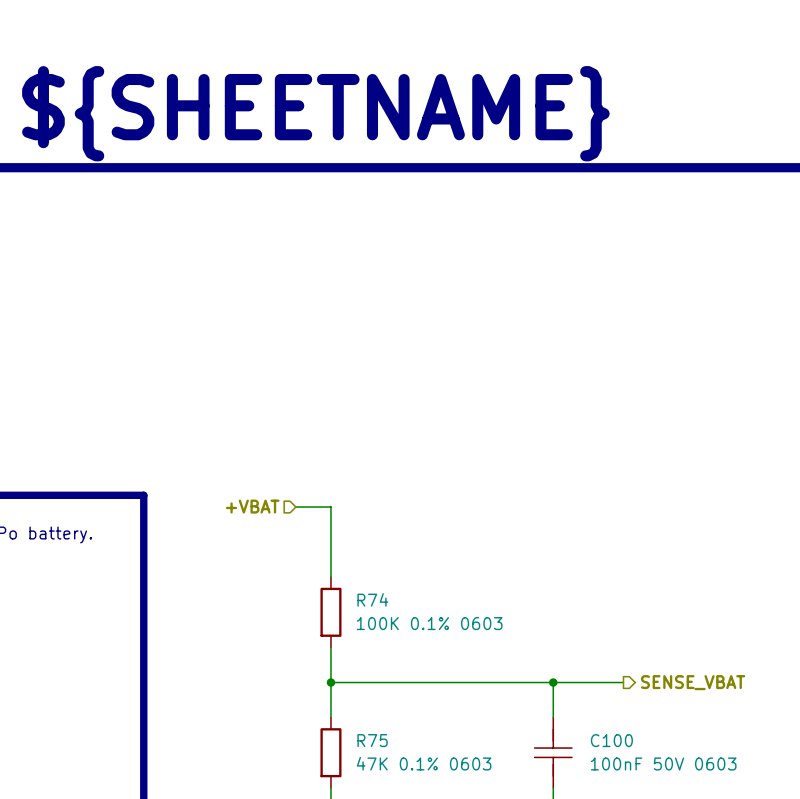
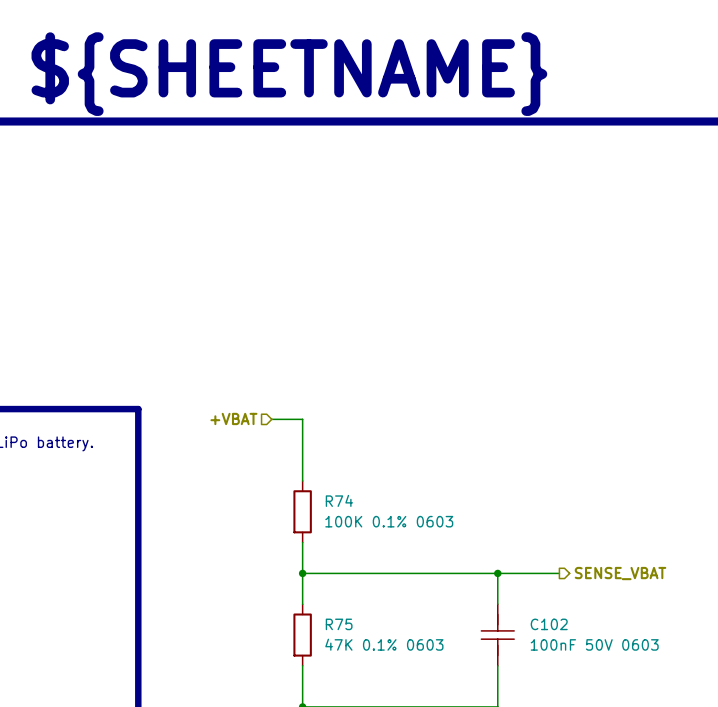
C100 name: C100 (611, 740) -> C102 (549, 624)

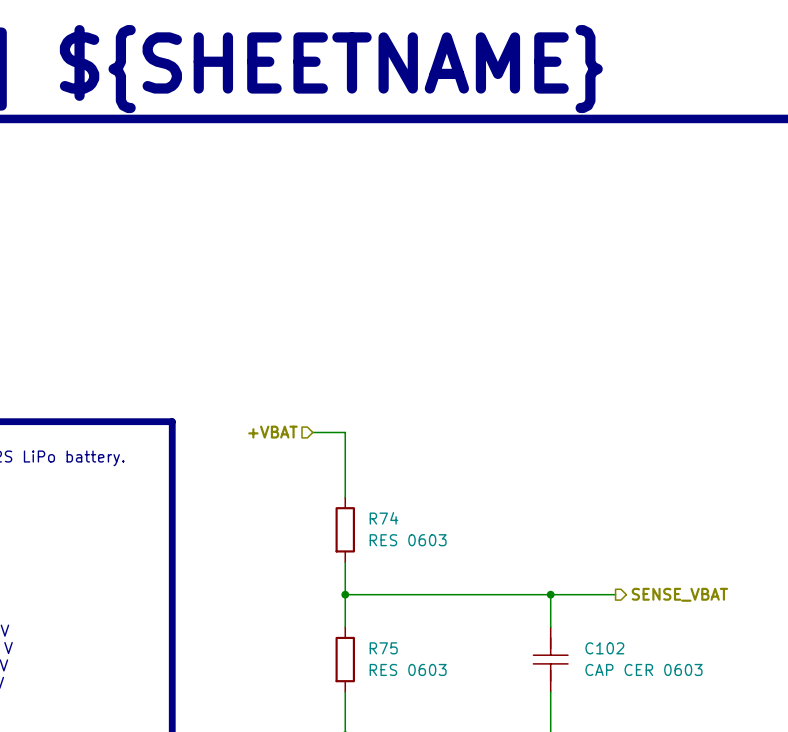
R74 value: 100K 0.1% 0603 (389, 521) -> RES 0603 (408, 540)
R75 value: 47K 0.1% 0603 (384, 644) -> RES 0603 (408, 669)
C102 value: 100nF 50V 0603 (594, 644) -> CAP CER 0603 (643, 669)

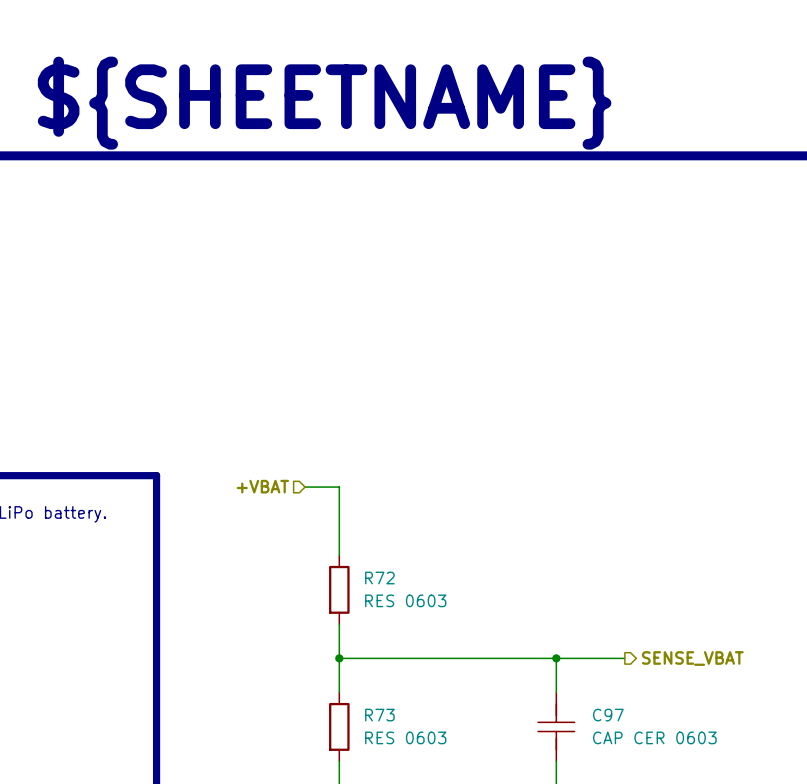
R74 name: R74 (383, 518) -> R72 (379, 578)
R75 name: R75 (383, 648) -> R73 (379, 715)
C102 name: C102 (604, 648) -> C97 (608, 715)

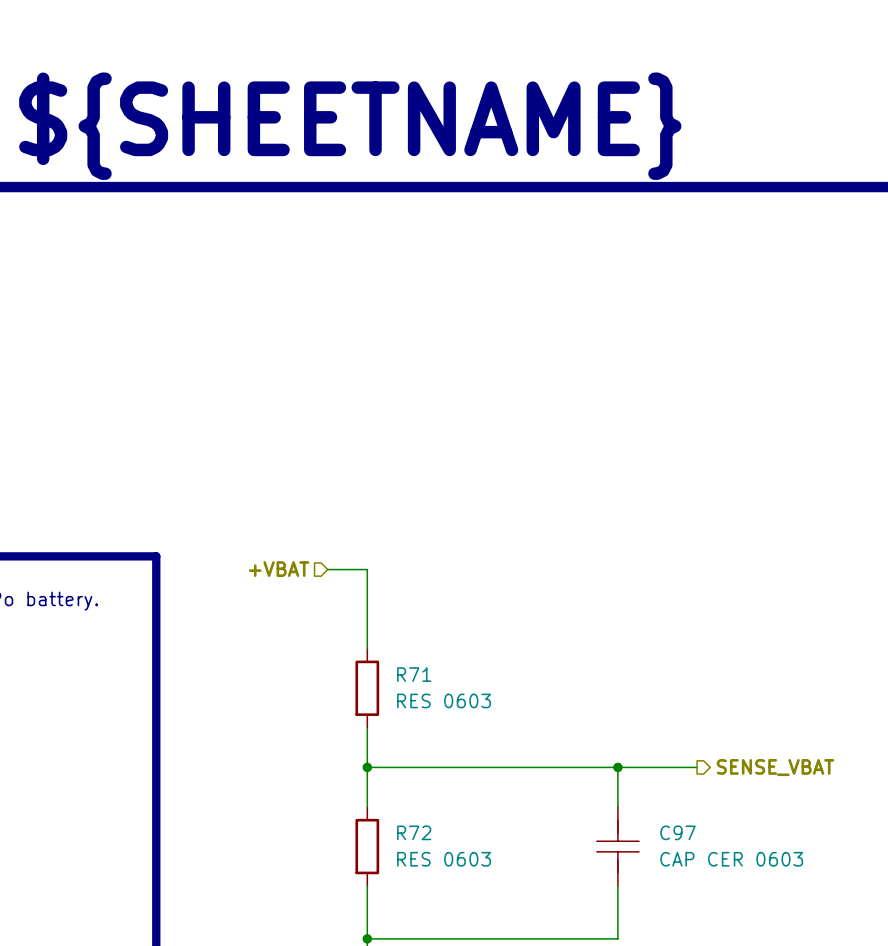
R72 name: R72 (379, 578) -> R71 (414, 674)
R73 name: R73 (379, 715) -> R72 (414, 832)

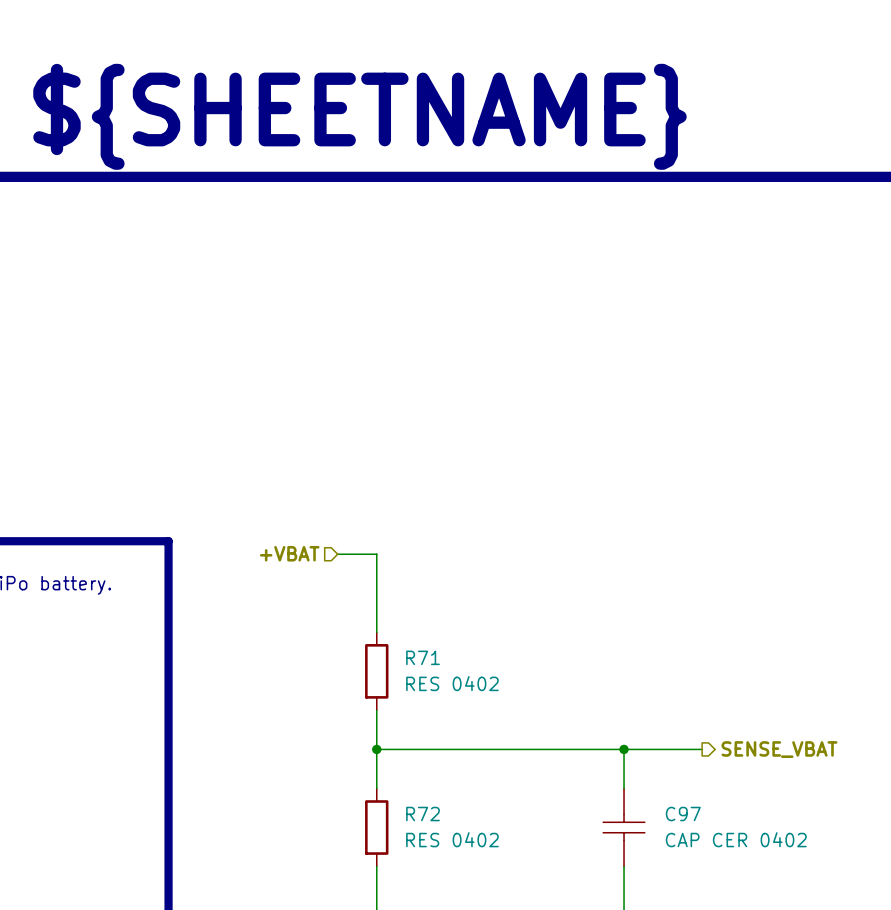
R71 value: RES 0603 (444, 700) -> RES 0402 (452, 683)
C97 symbol: [596, 806, 640, 887] -> [603, 788, 645, 867]
R72 value: RES 0603 (444, 859) -> RES 0402 (452, 839)
C97 value: CAP CER 0603 (731, 859) -> CAP CER 0402 (736, 839)

